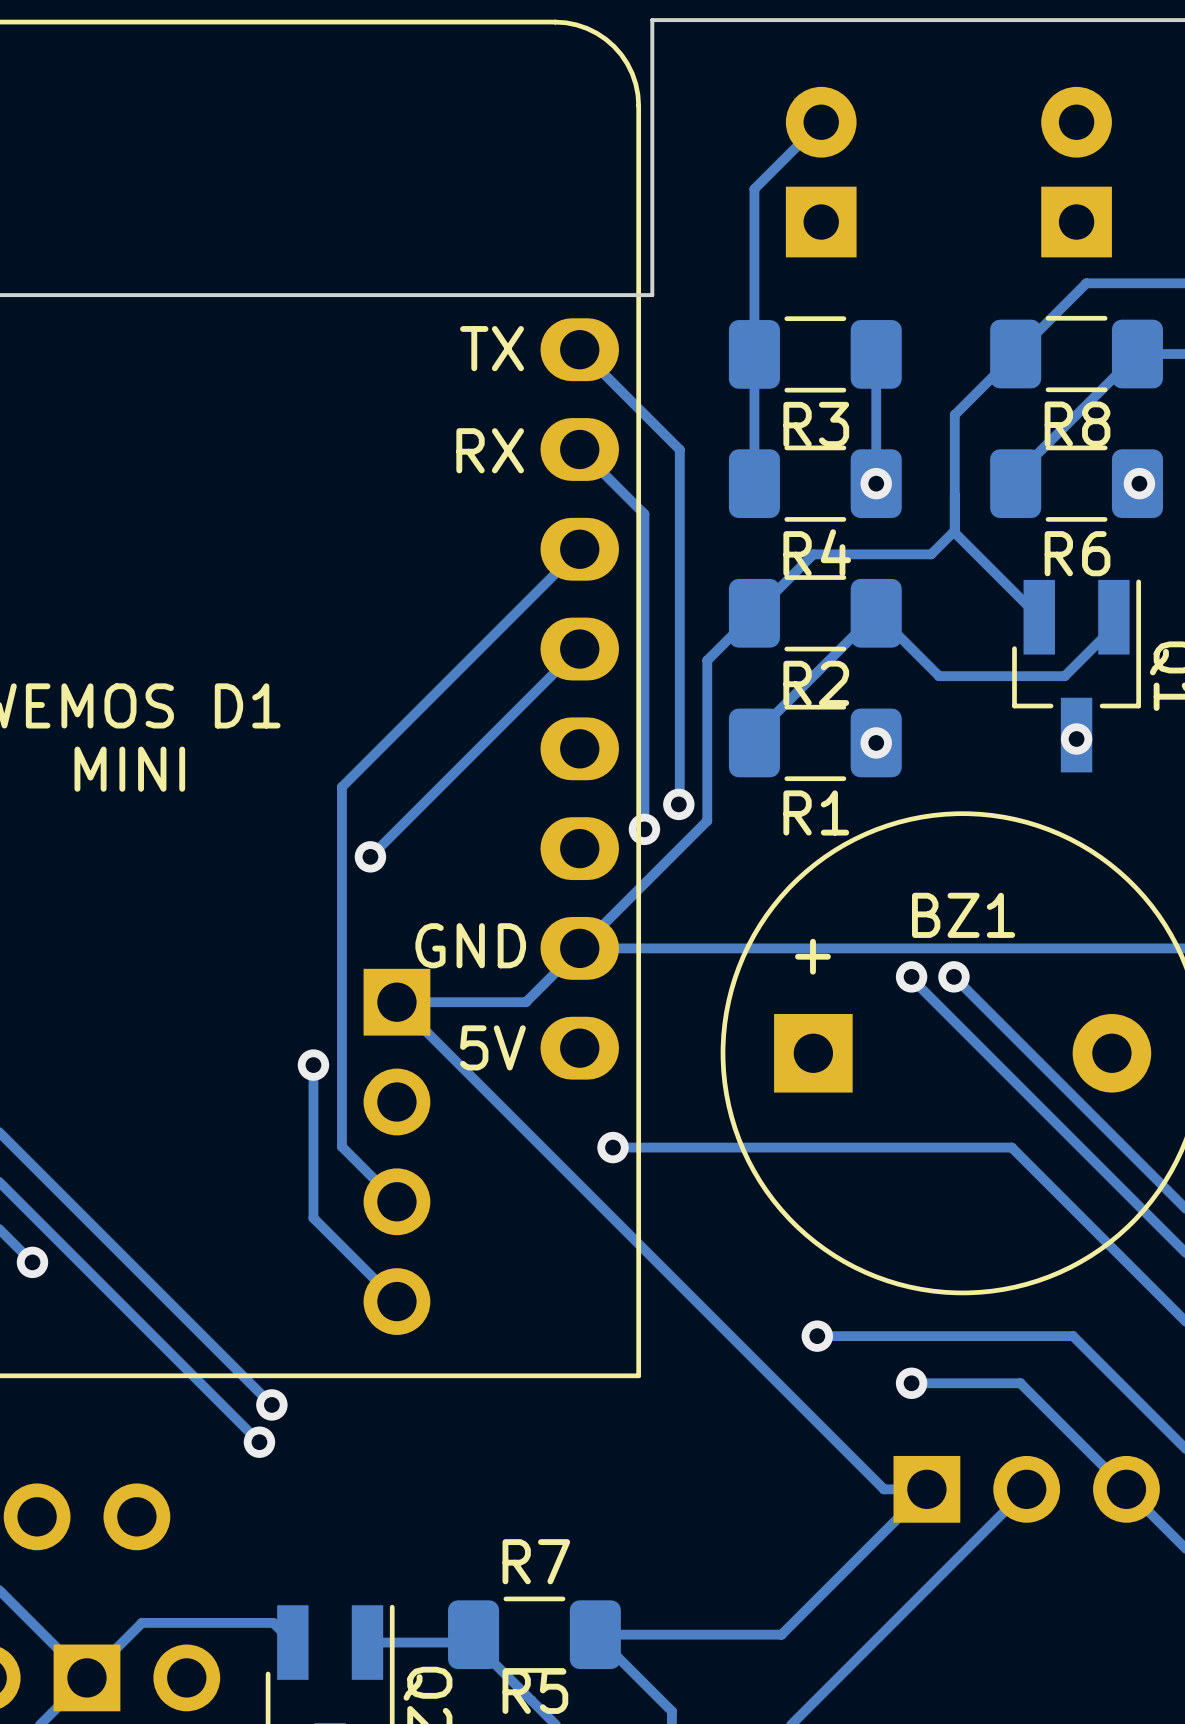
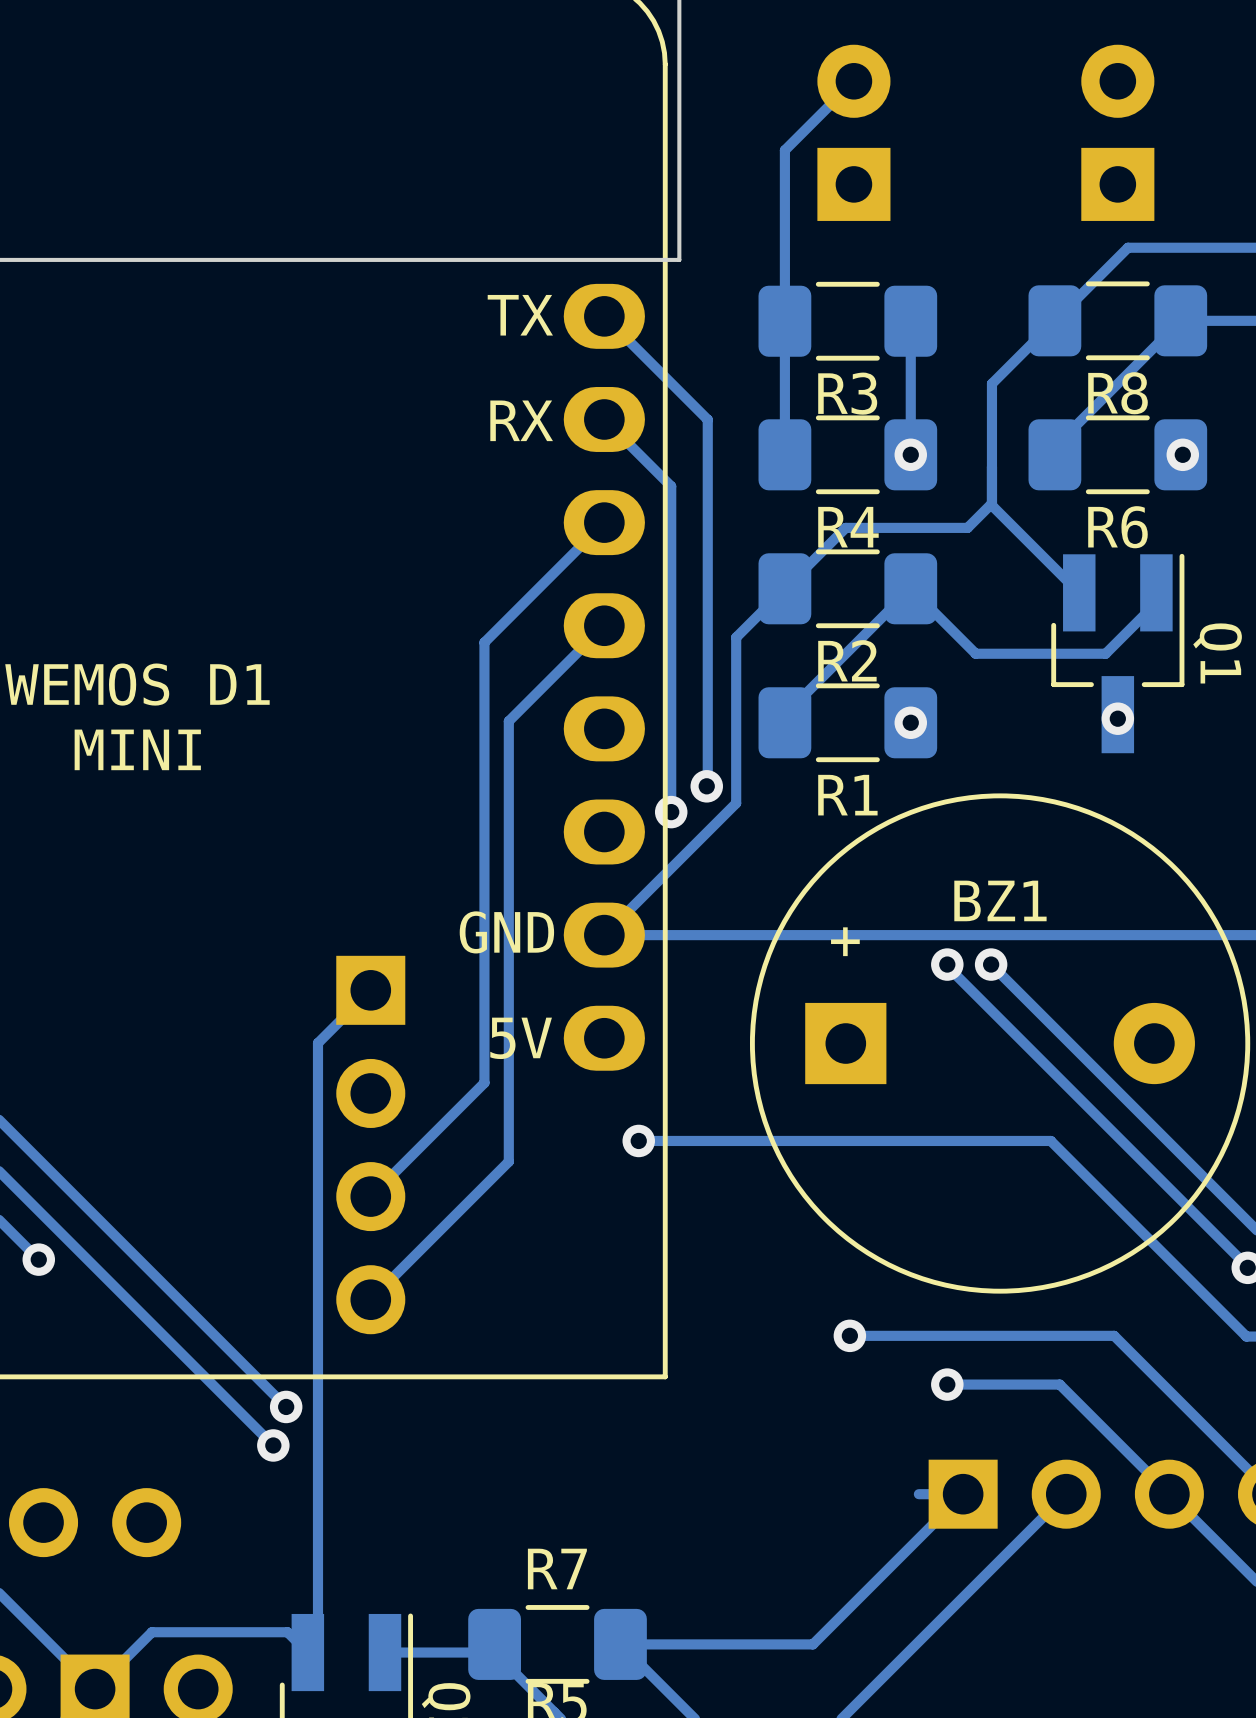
track: (578, 649) (370, 856) -> (604, 625) (508, 721) (508, 1161) (370, 1299)
track: (463, 665) (341, 787) (341, 1146) (396, 1201) -> (484, 642) (484, 1082) (370, 1196)
via: (370, 856) -> none
track: (579, 948) (525, 1002) (396, 1002) (884, 1489) -> none
track: none -> (370, 990) (318, 1043) (318, 1642) (307, 1652)
track: (313, 1065) (313, 1218) (396, 1301) -> none
via: (313, 1065) -> none
part position: (396, 1151) -> (370, 1145)

